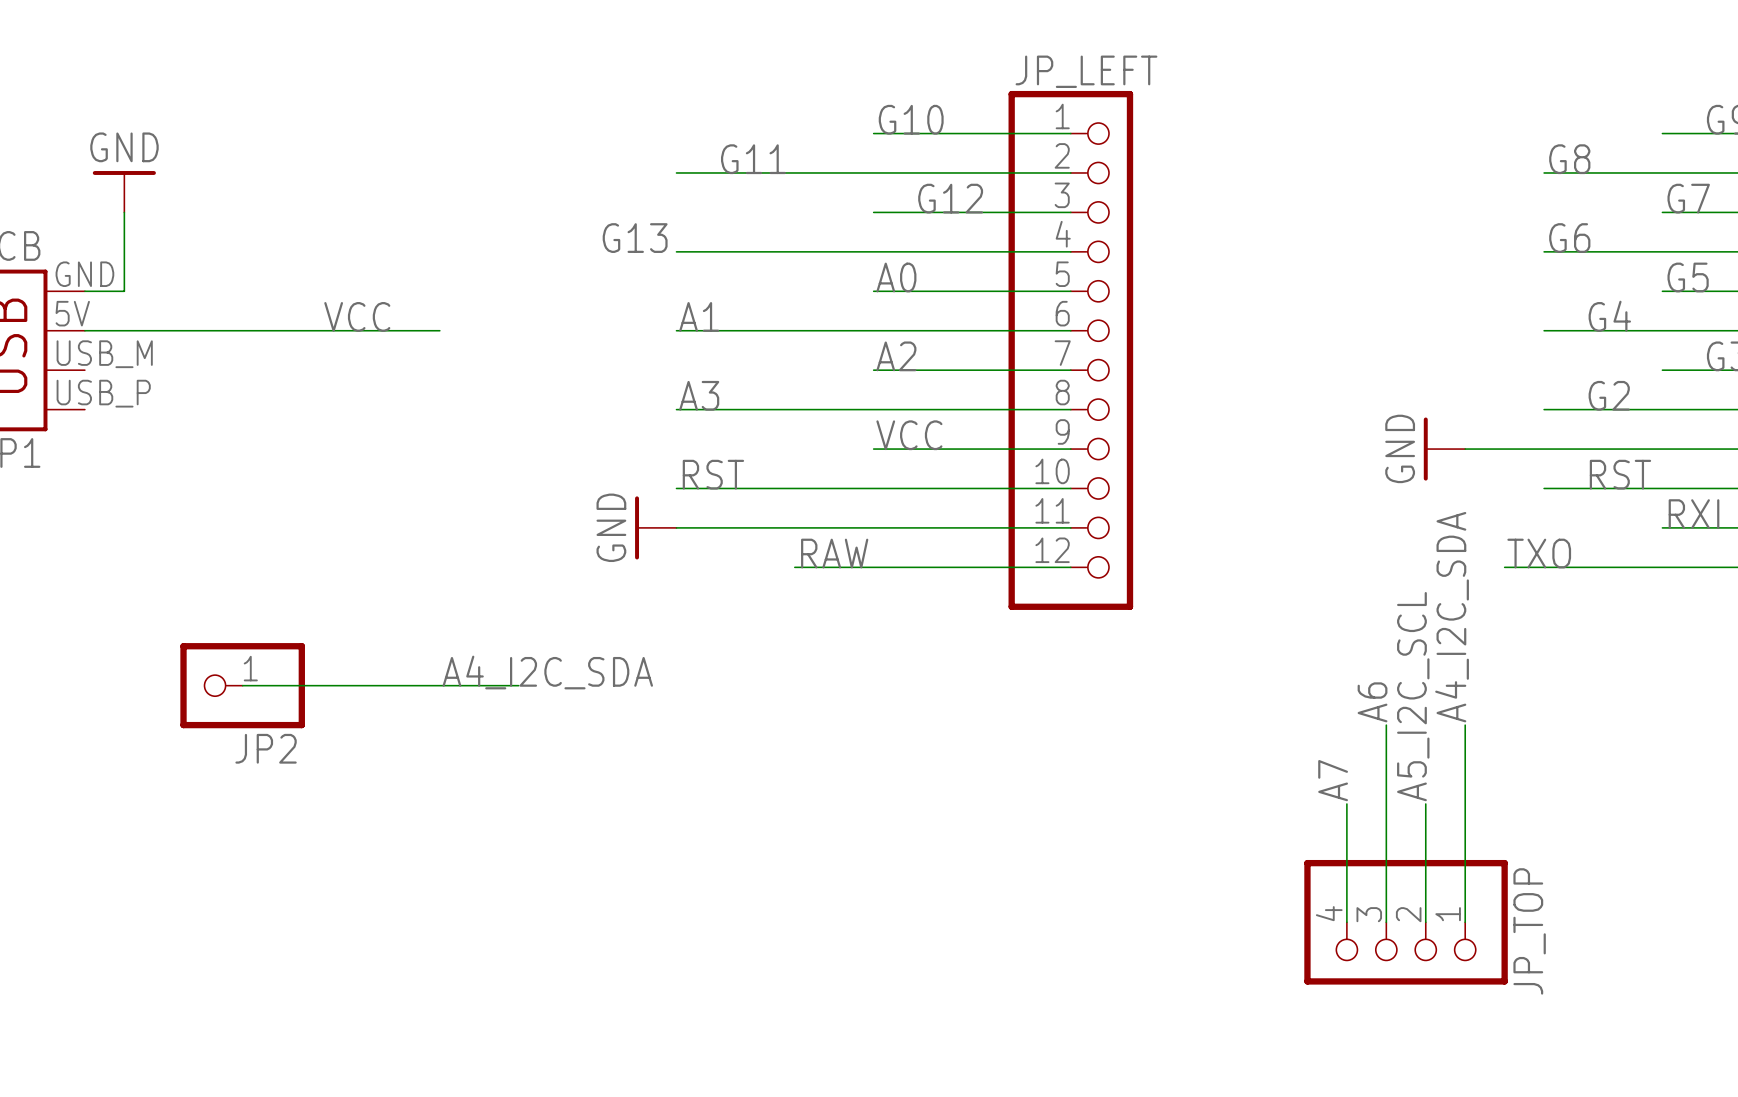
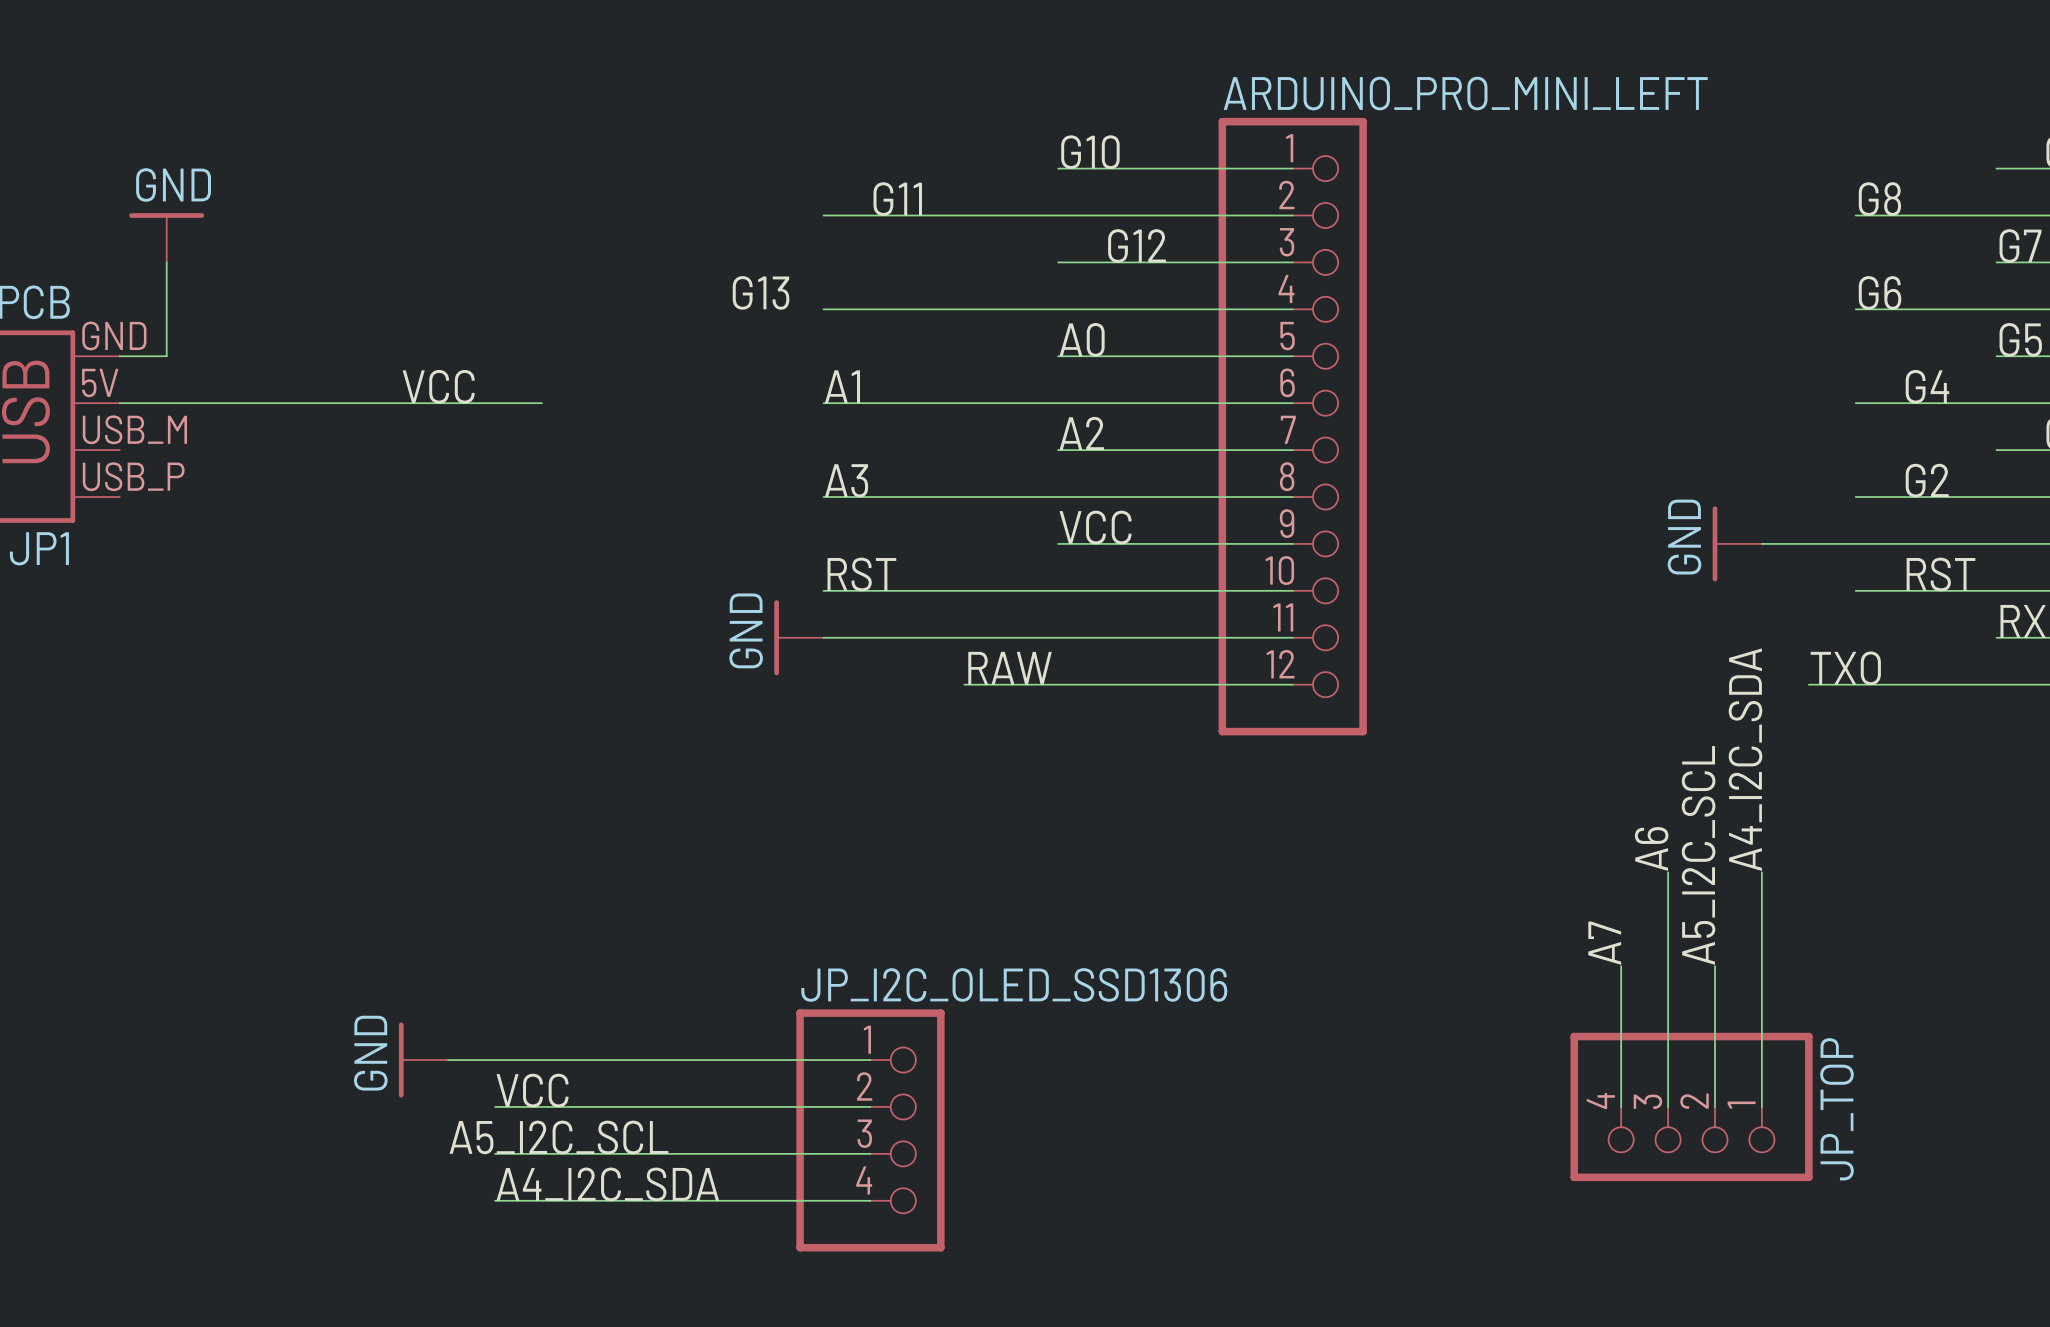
JP_LEFT name: JP_LEFT (1086, 71) -> ARDUINO_PRO_MINI_LEFT (1465, 93)
label position: A4_I2C_SDA (547, 672) -> A4_I2C_SDA (607, 1184)
wire: (242, 685) (518, 685) -> none
JP2: (242, 685) -> none
power symbol: none -> GND (423, 1060)
wire: none -> (448, 1060) (870, 1060)
label: none -> VCC (532, 1090)
wire: none -> (495, 1106) (870, 1106)
JP_I2C_OLED_SSD1306: none -> (870, 1130)
label: none -> A5_I2C_SCL (558, 1137)
wire: none -> (495, 1153) (870, 1153)
wire: none -> (495, 1200) (870, 1200)

